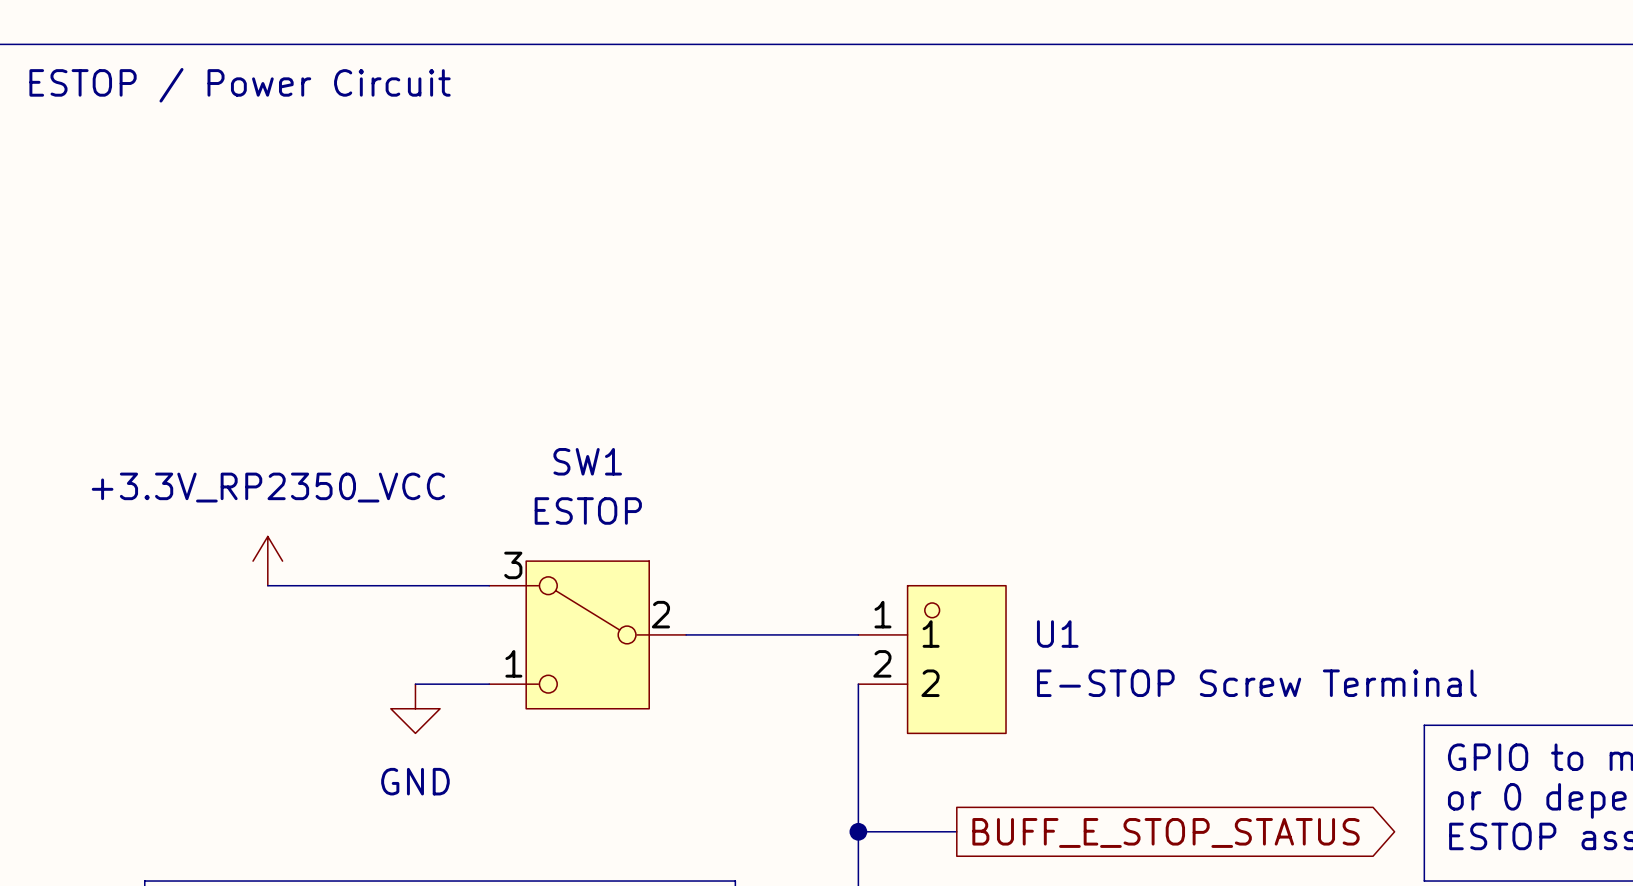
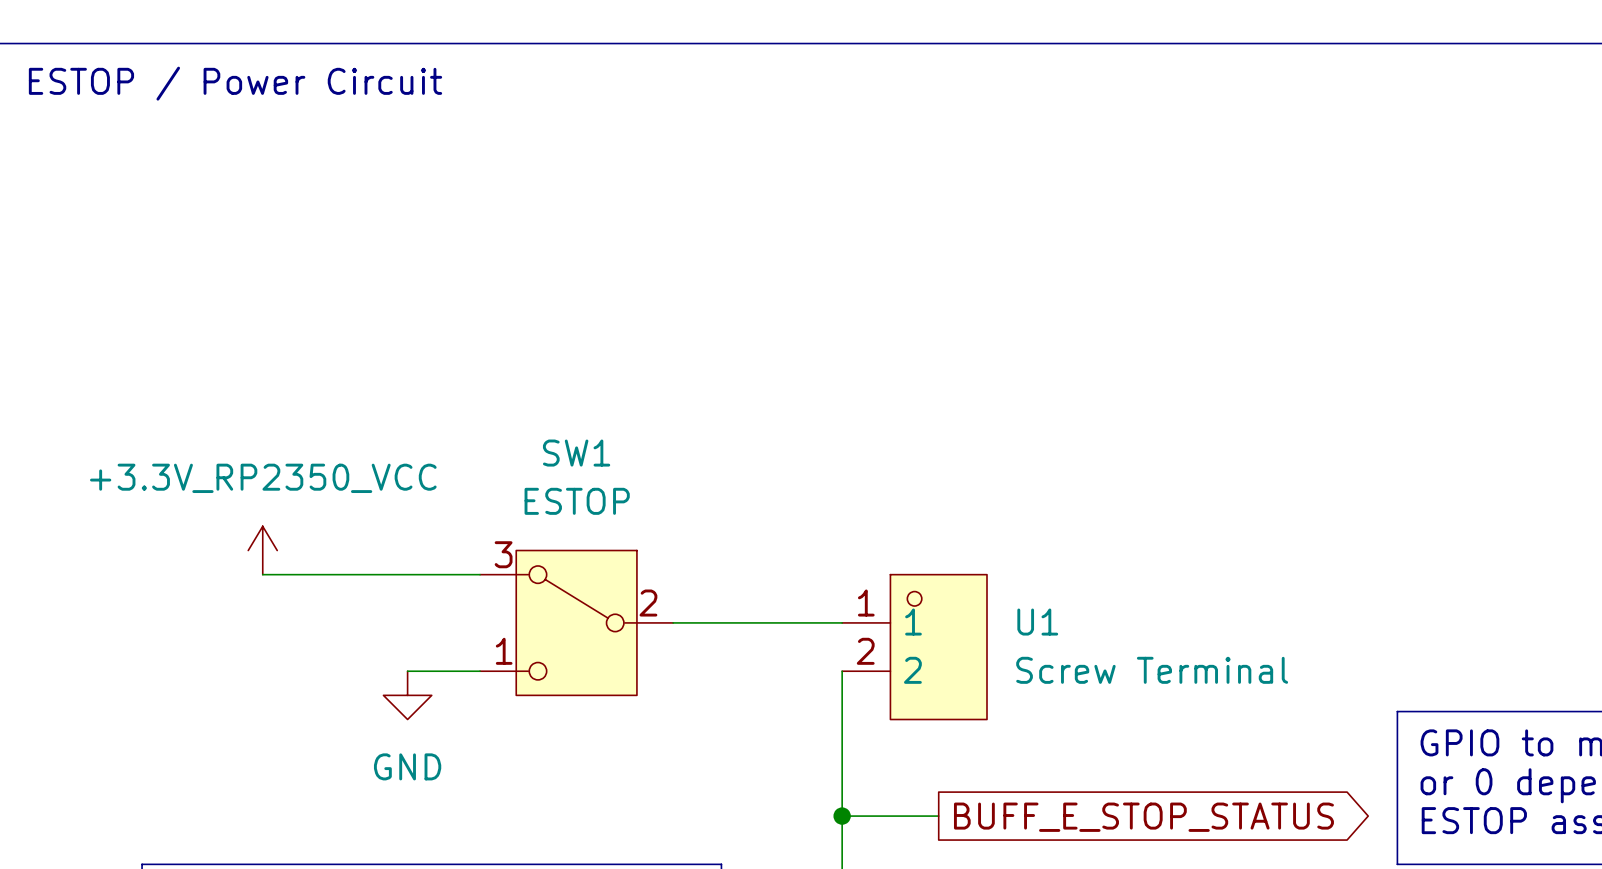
U1 value: E-STOP Screw Terminal (1256, 683) -> Screw Terminal (1152, 670)

